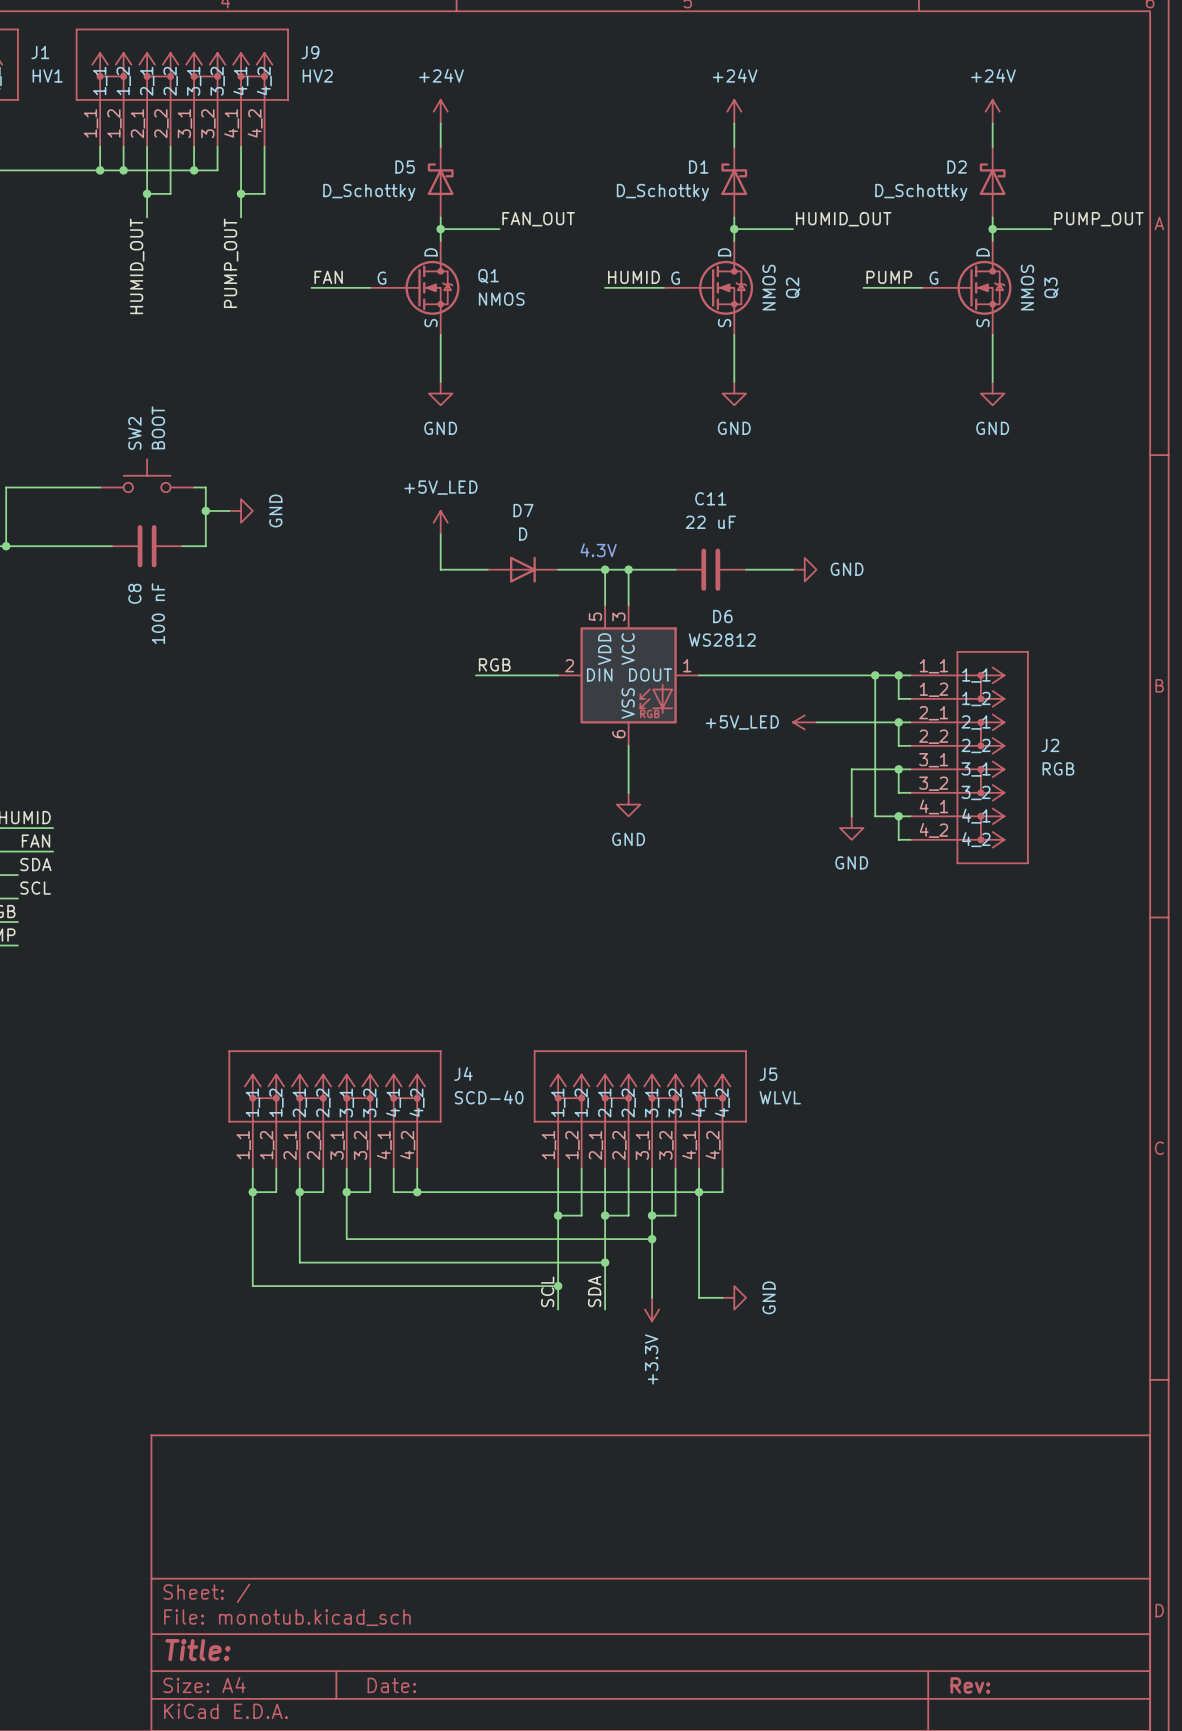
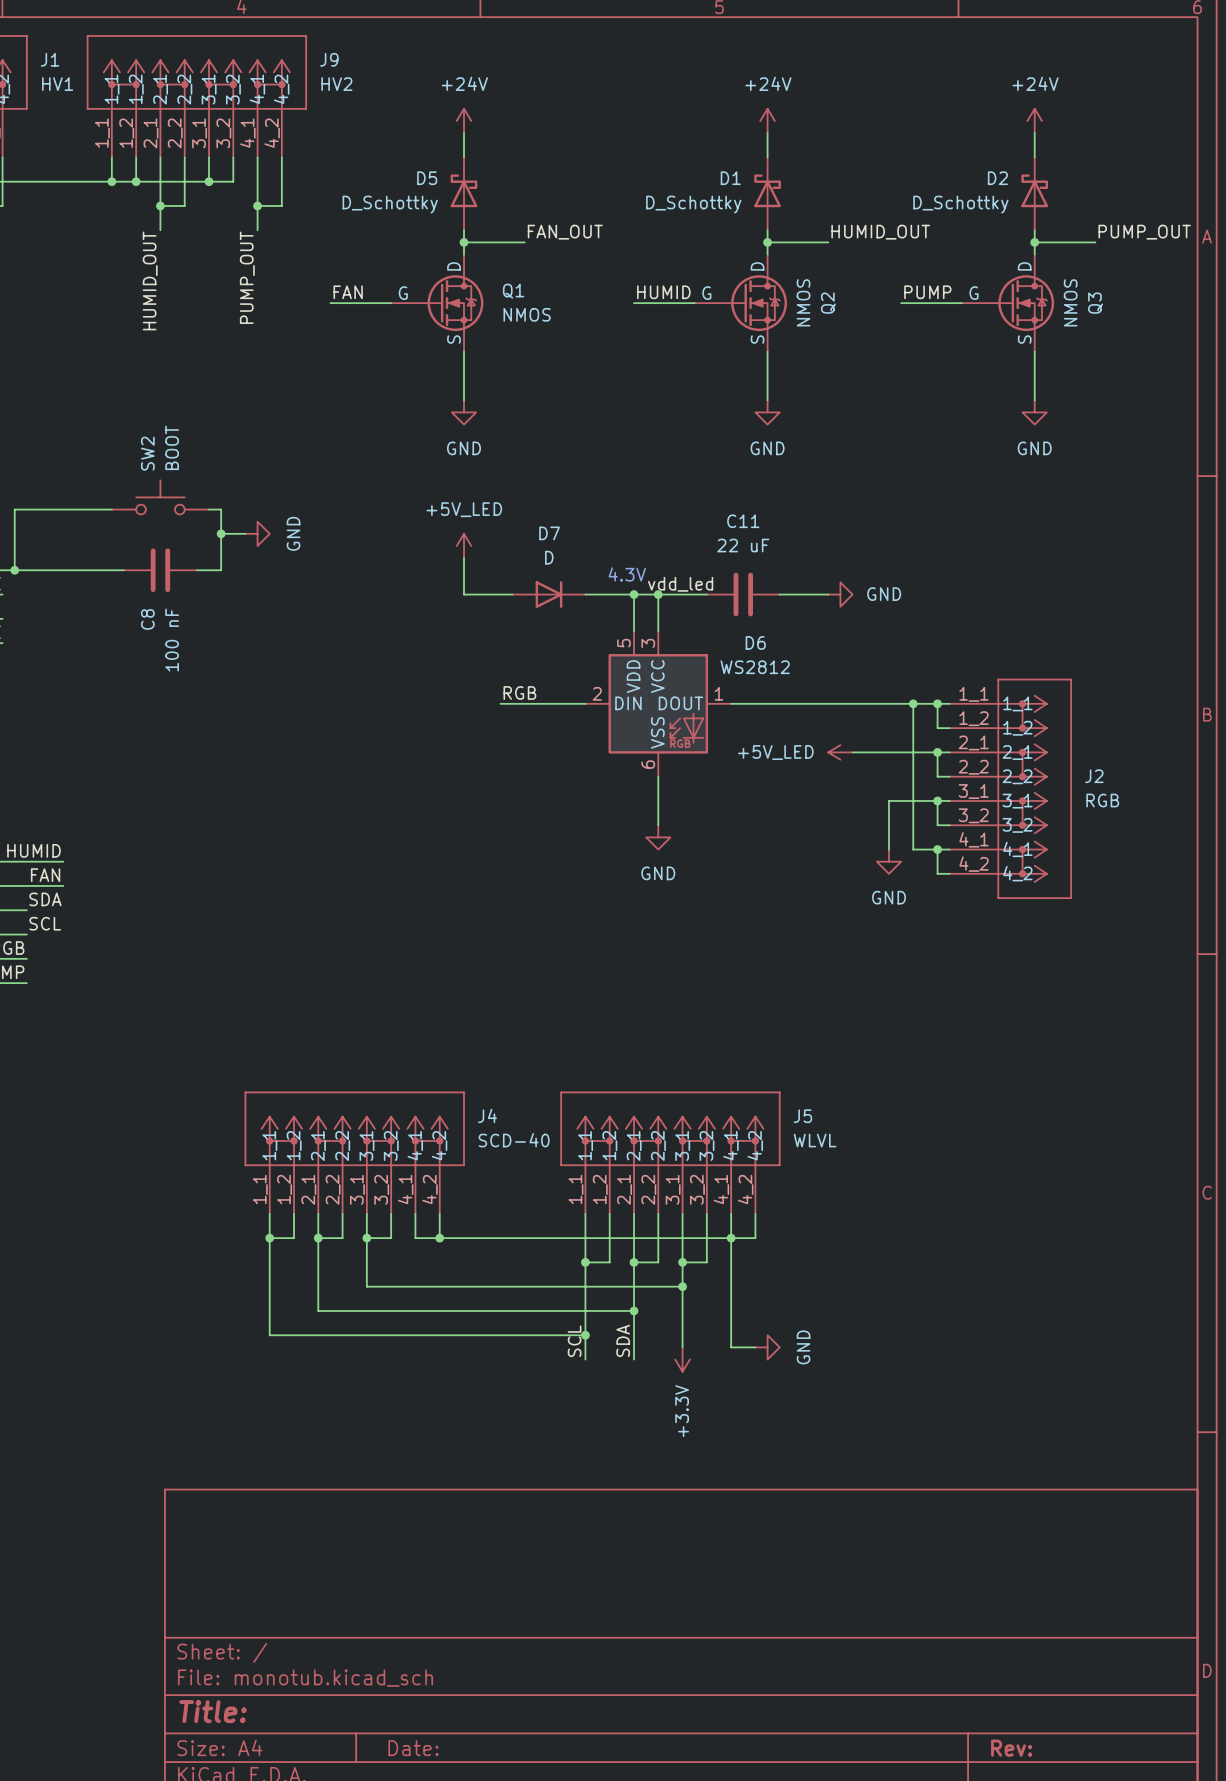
label: none -> vdd_led (680, 584)

